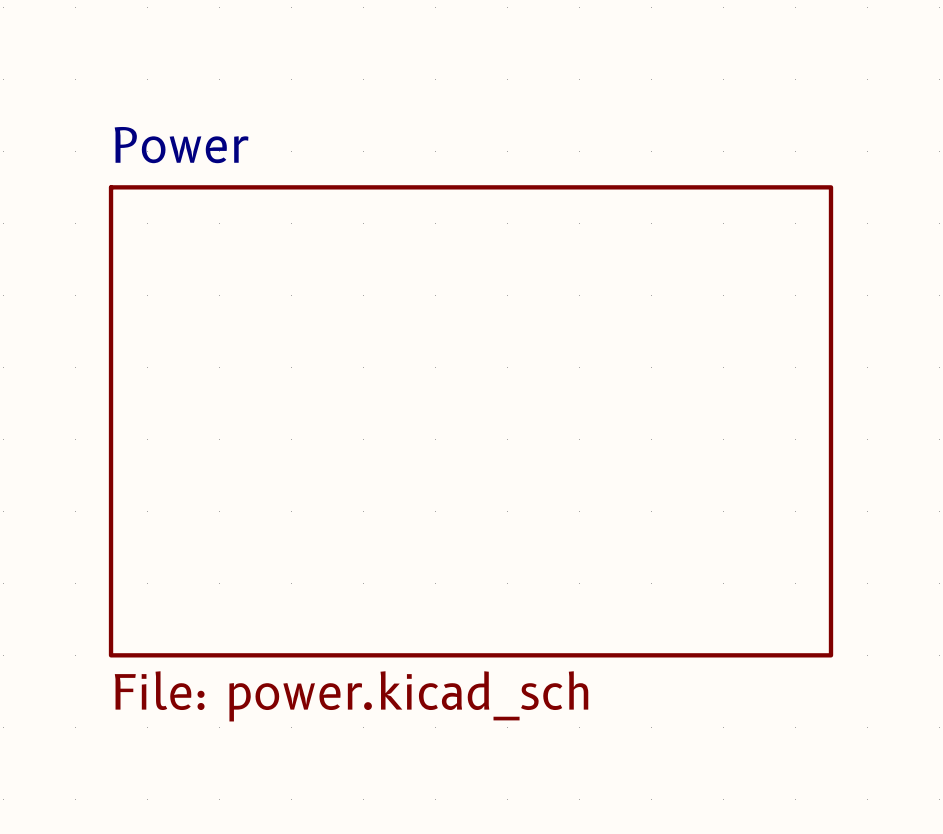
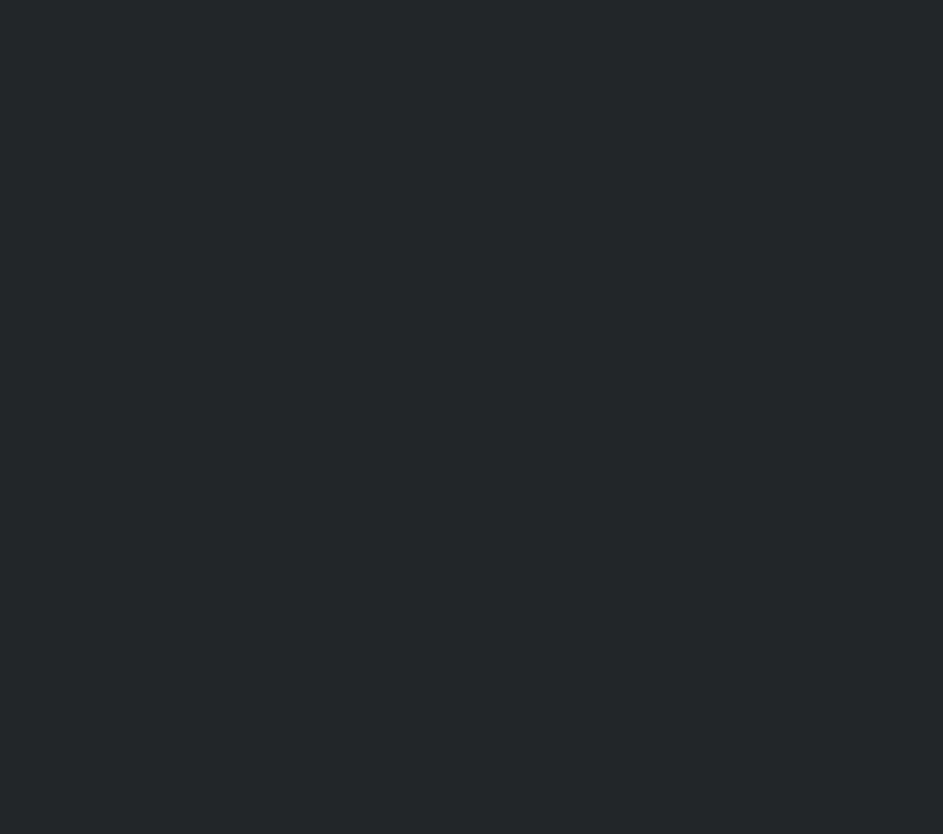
sheet Power: File: power.kicad_sch (471, 421) -> none

